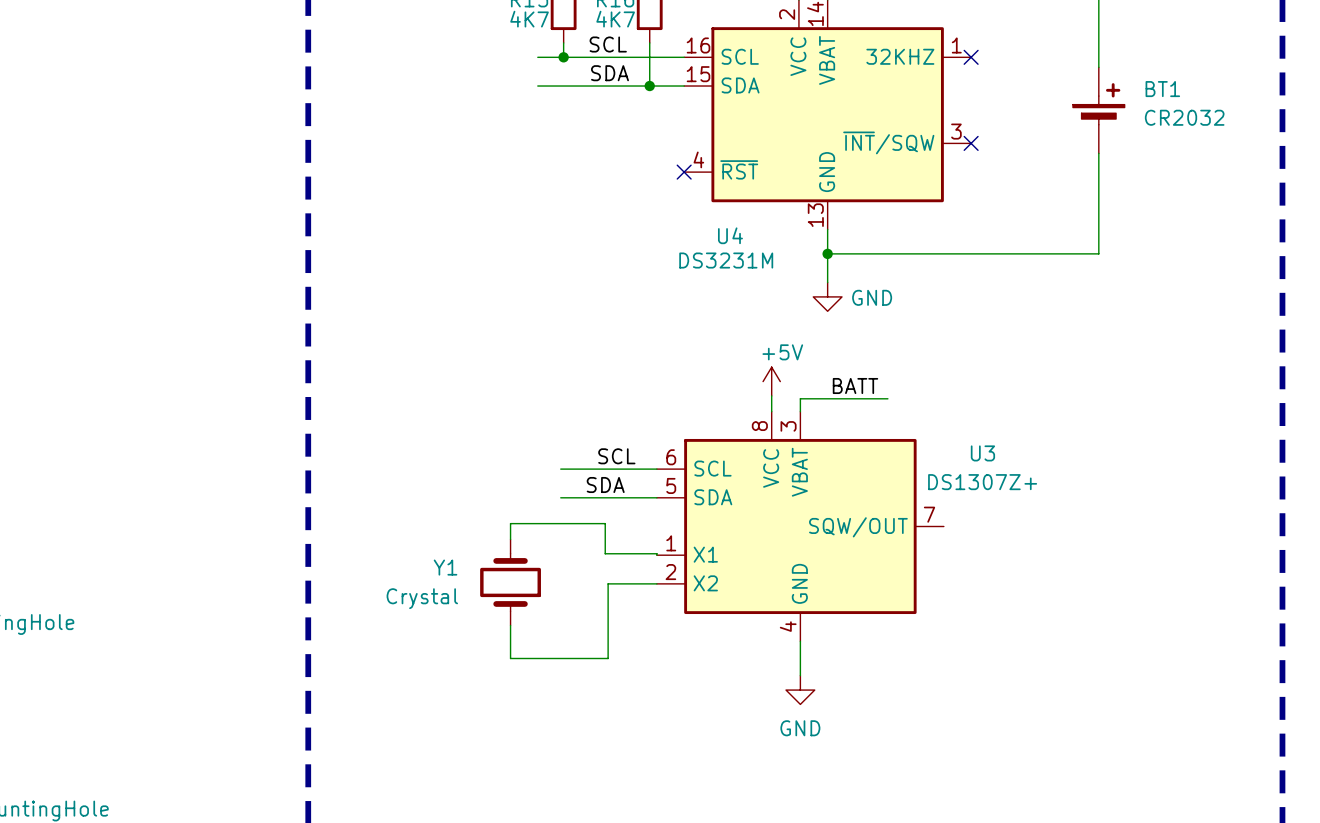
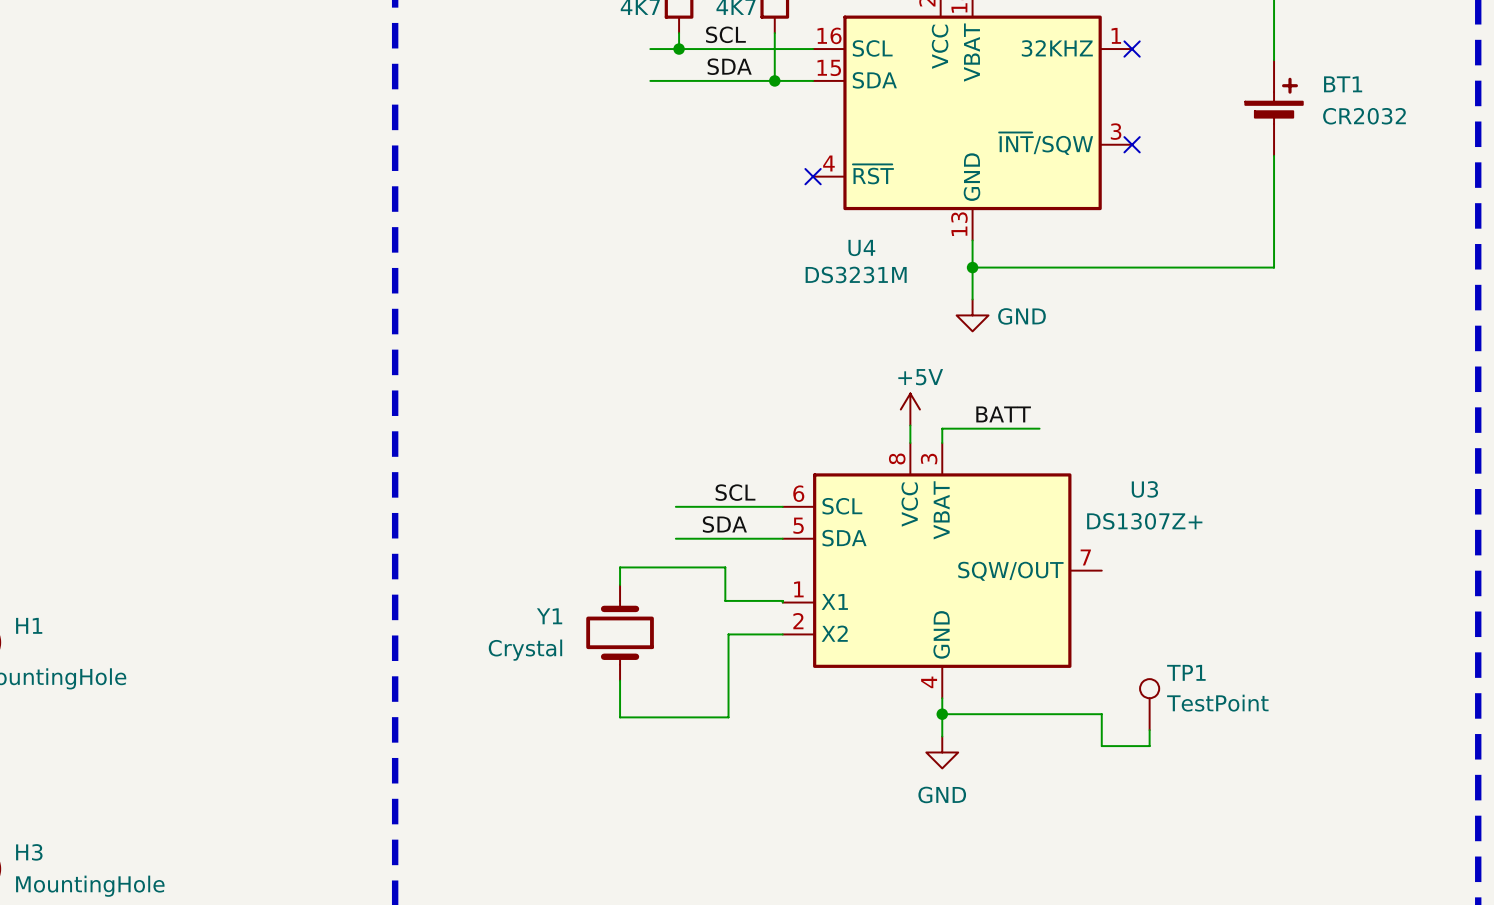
TP1: none -> TestPoint (1149, 704)
wire: none -> (942, 714) (1101, 714) (1101, 746) (1149, 746) (1149, 730)
junction: none -> (942, 714)

